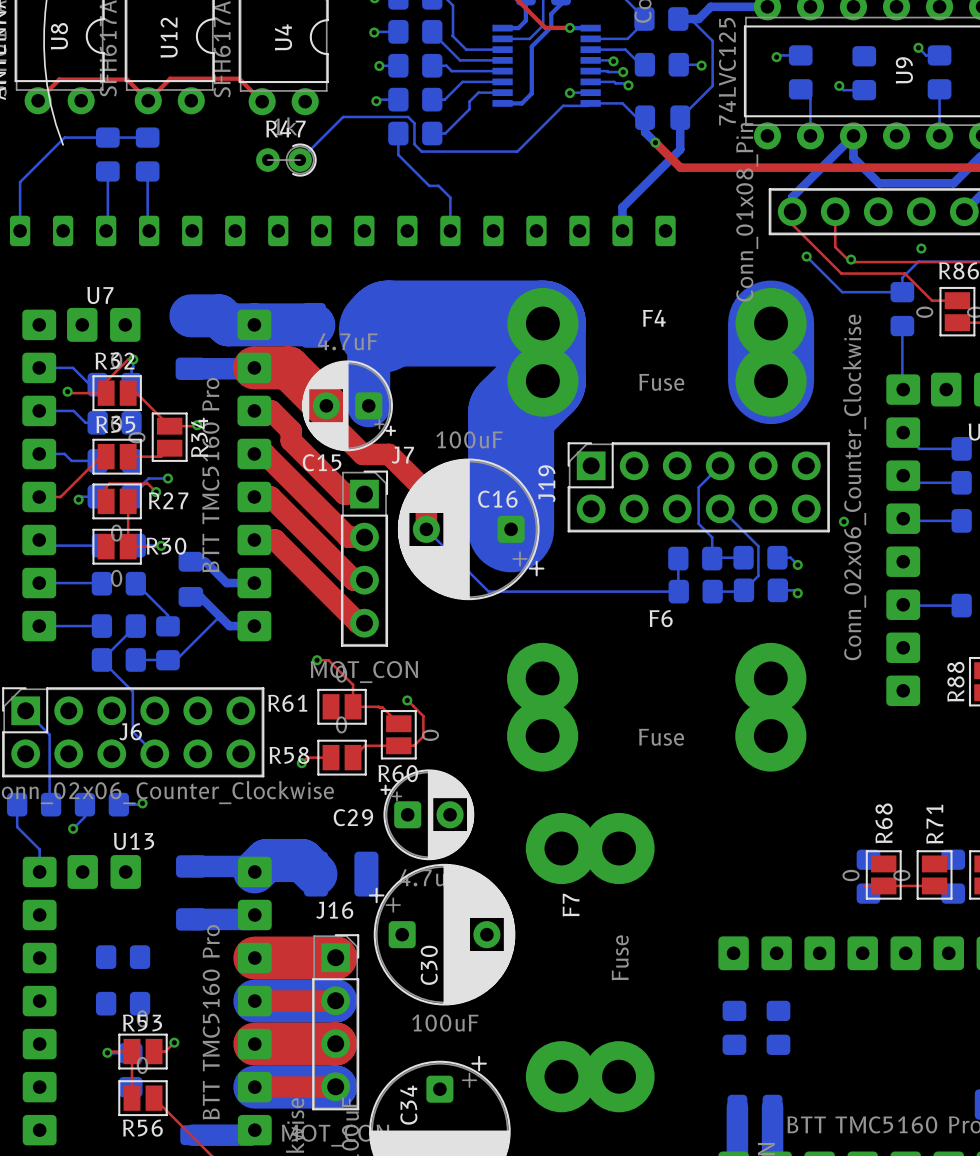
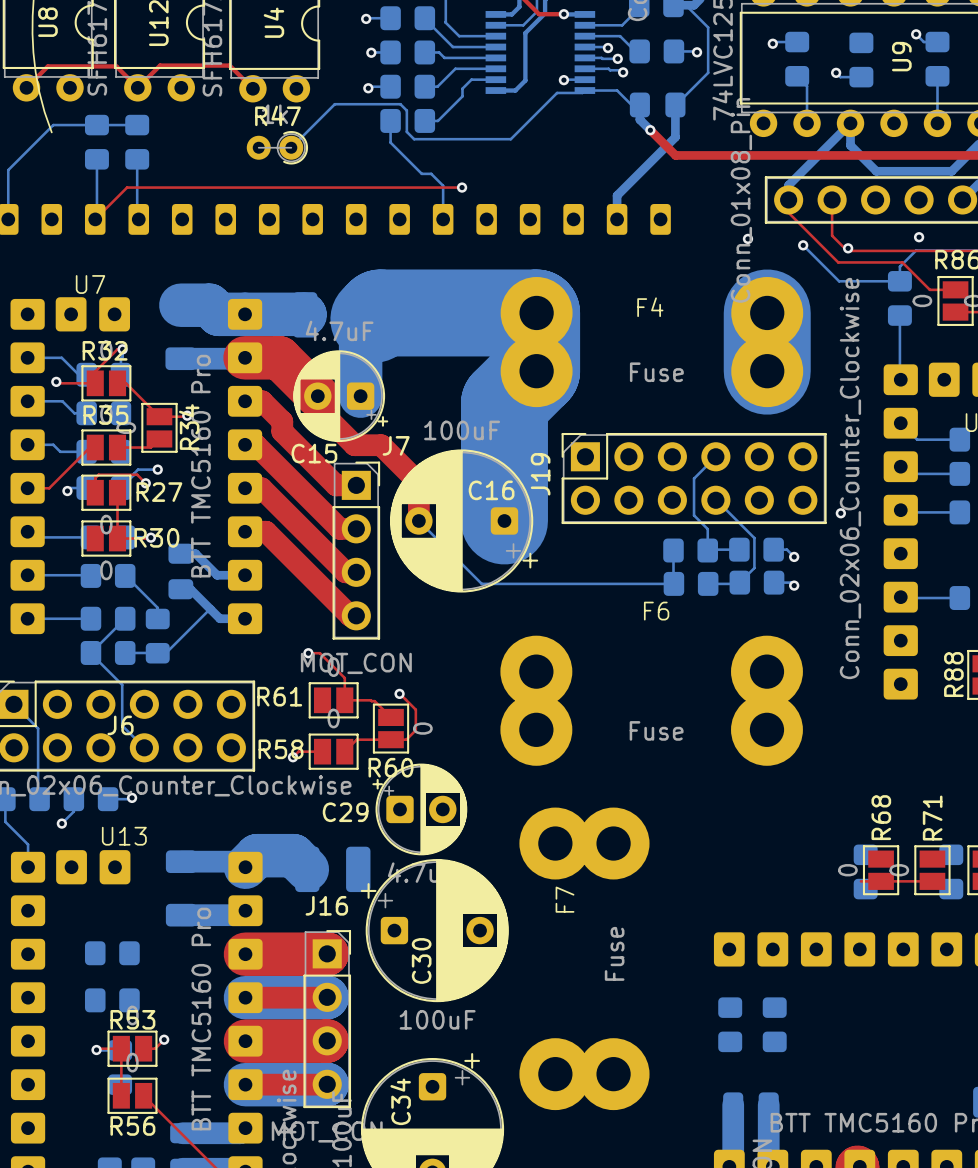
top track: none -> (462, 187) (127, 187) (95, 219)
via: none -> (462, 187)
via: none -> (747, 238)

